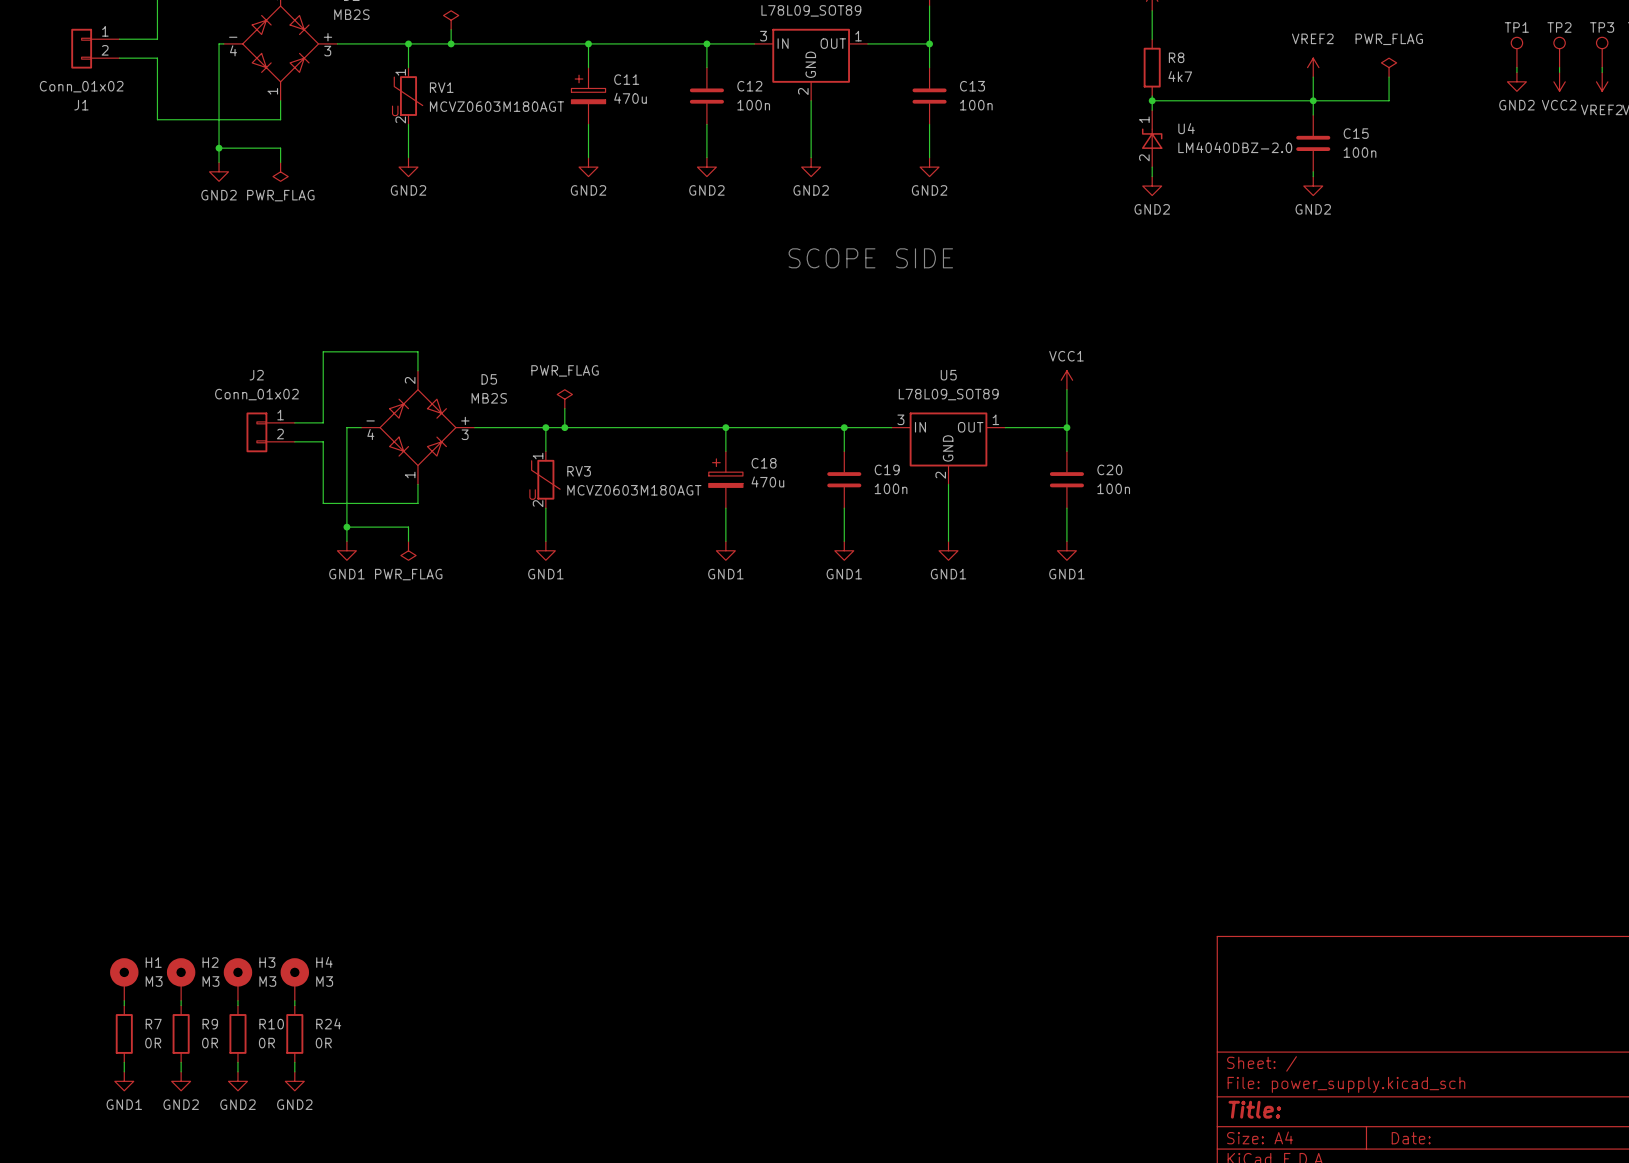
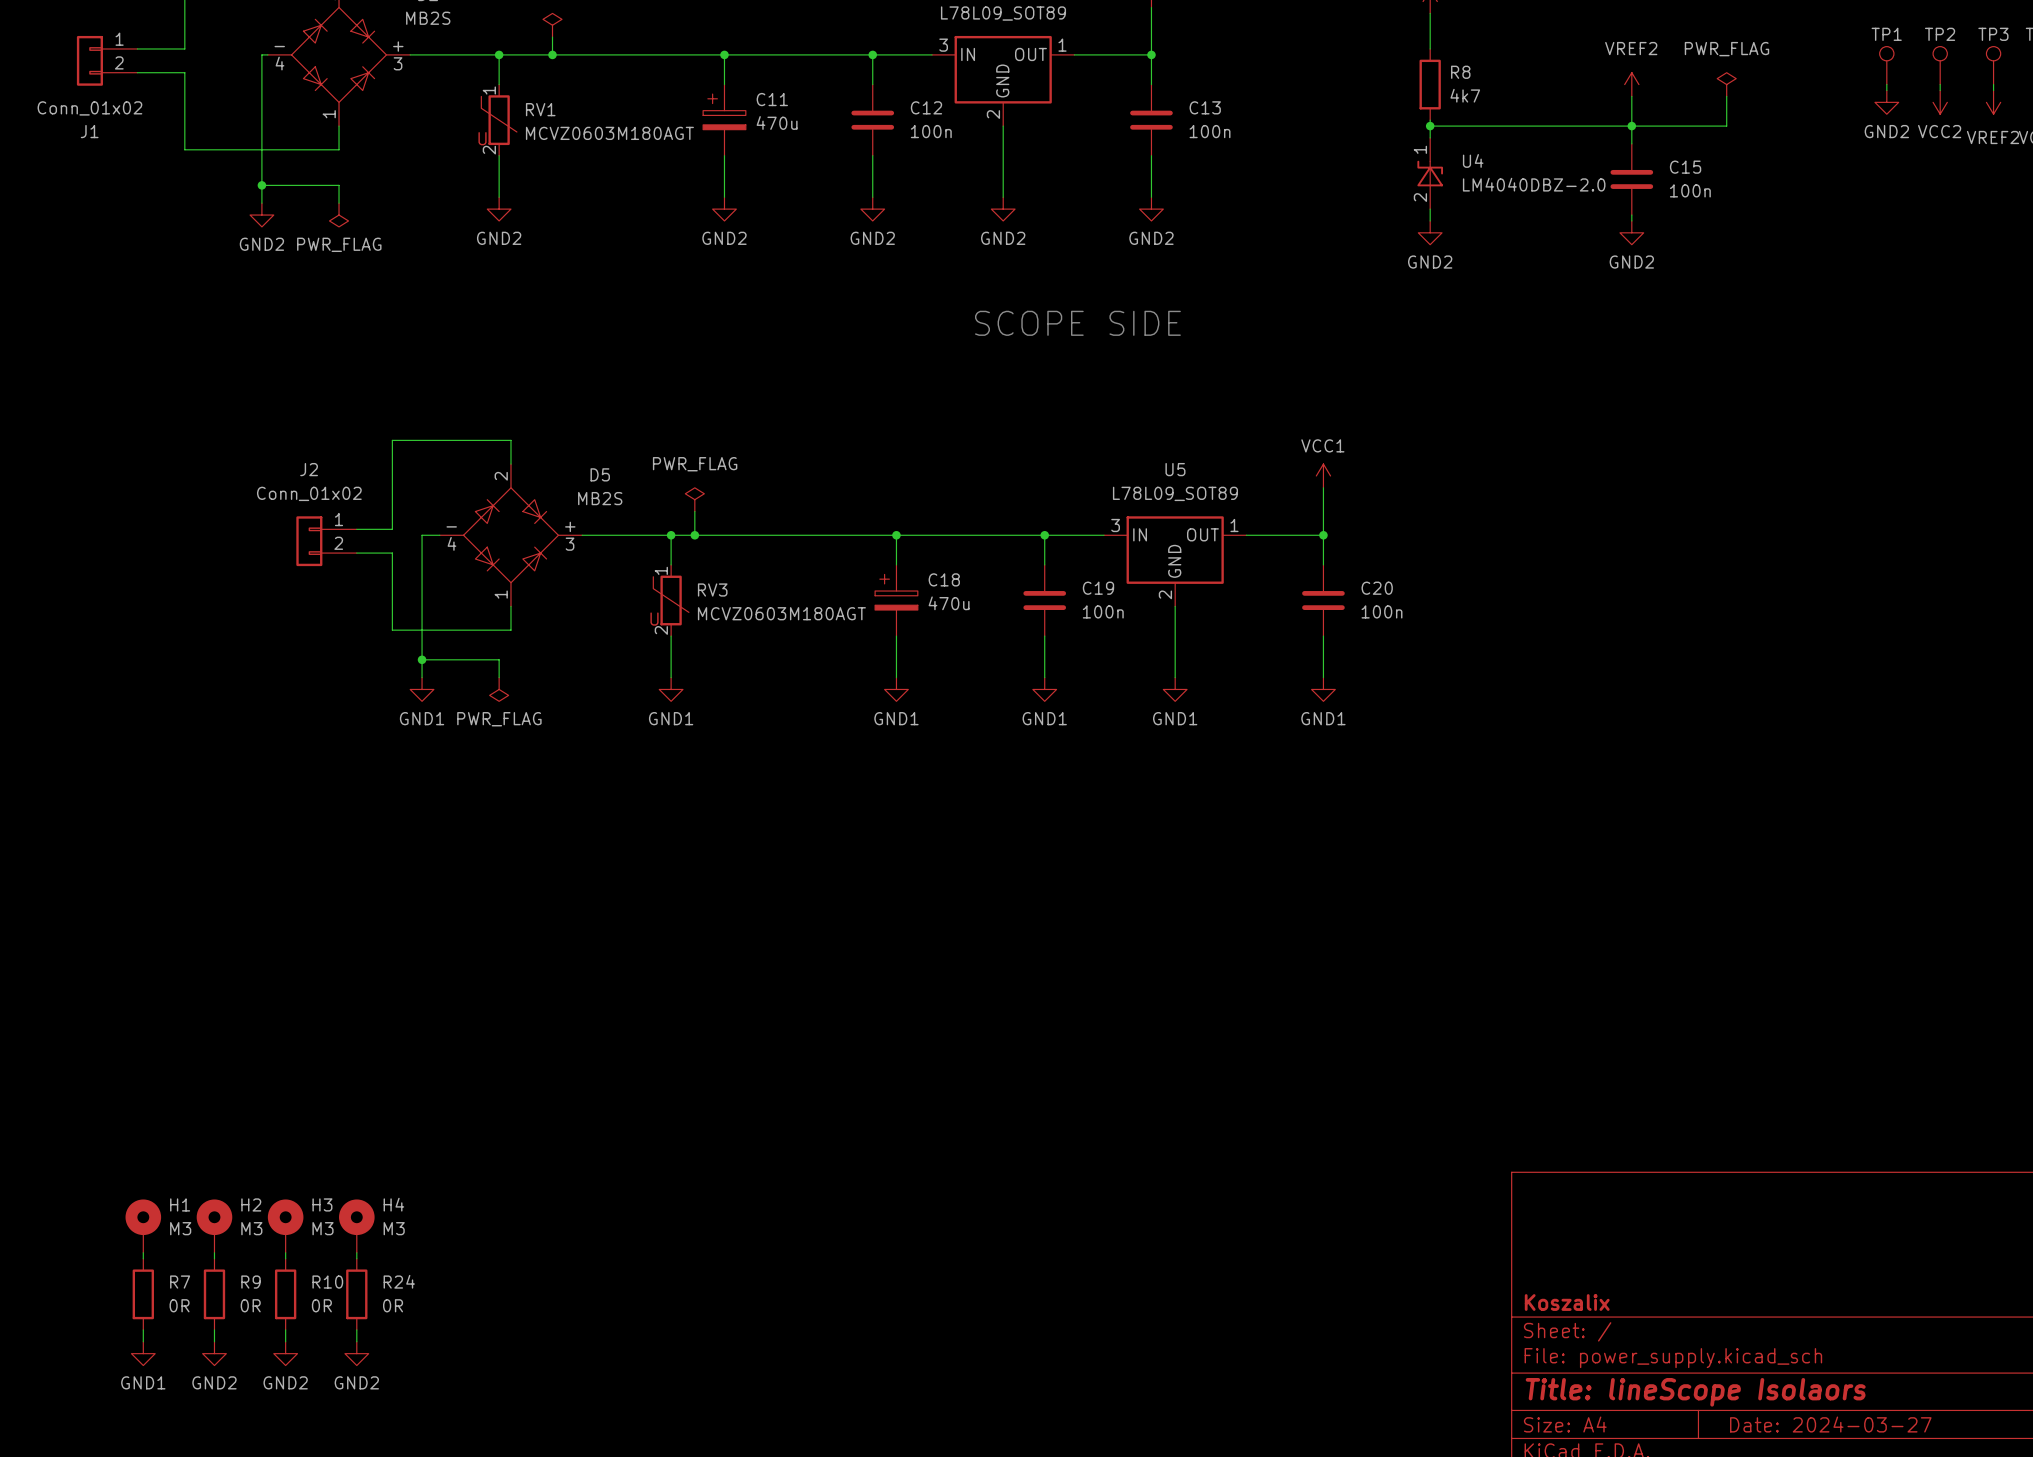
title block: none -> Koszalix (1567, 1302)
title block: Title: (1254, 1109) -> Title: lineScope Isolaors (1695, 1392)
title block: Date: (1411, 1138) -> Date: 2024-03-27 (1830, 1424)

